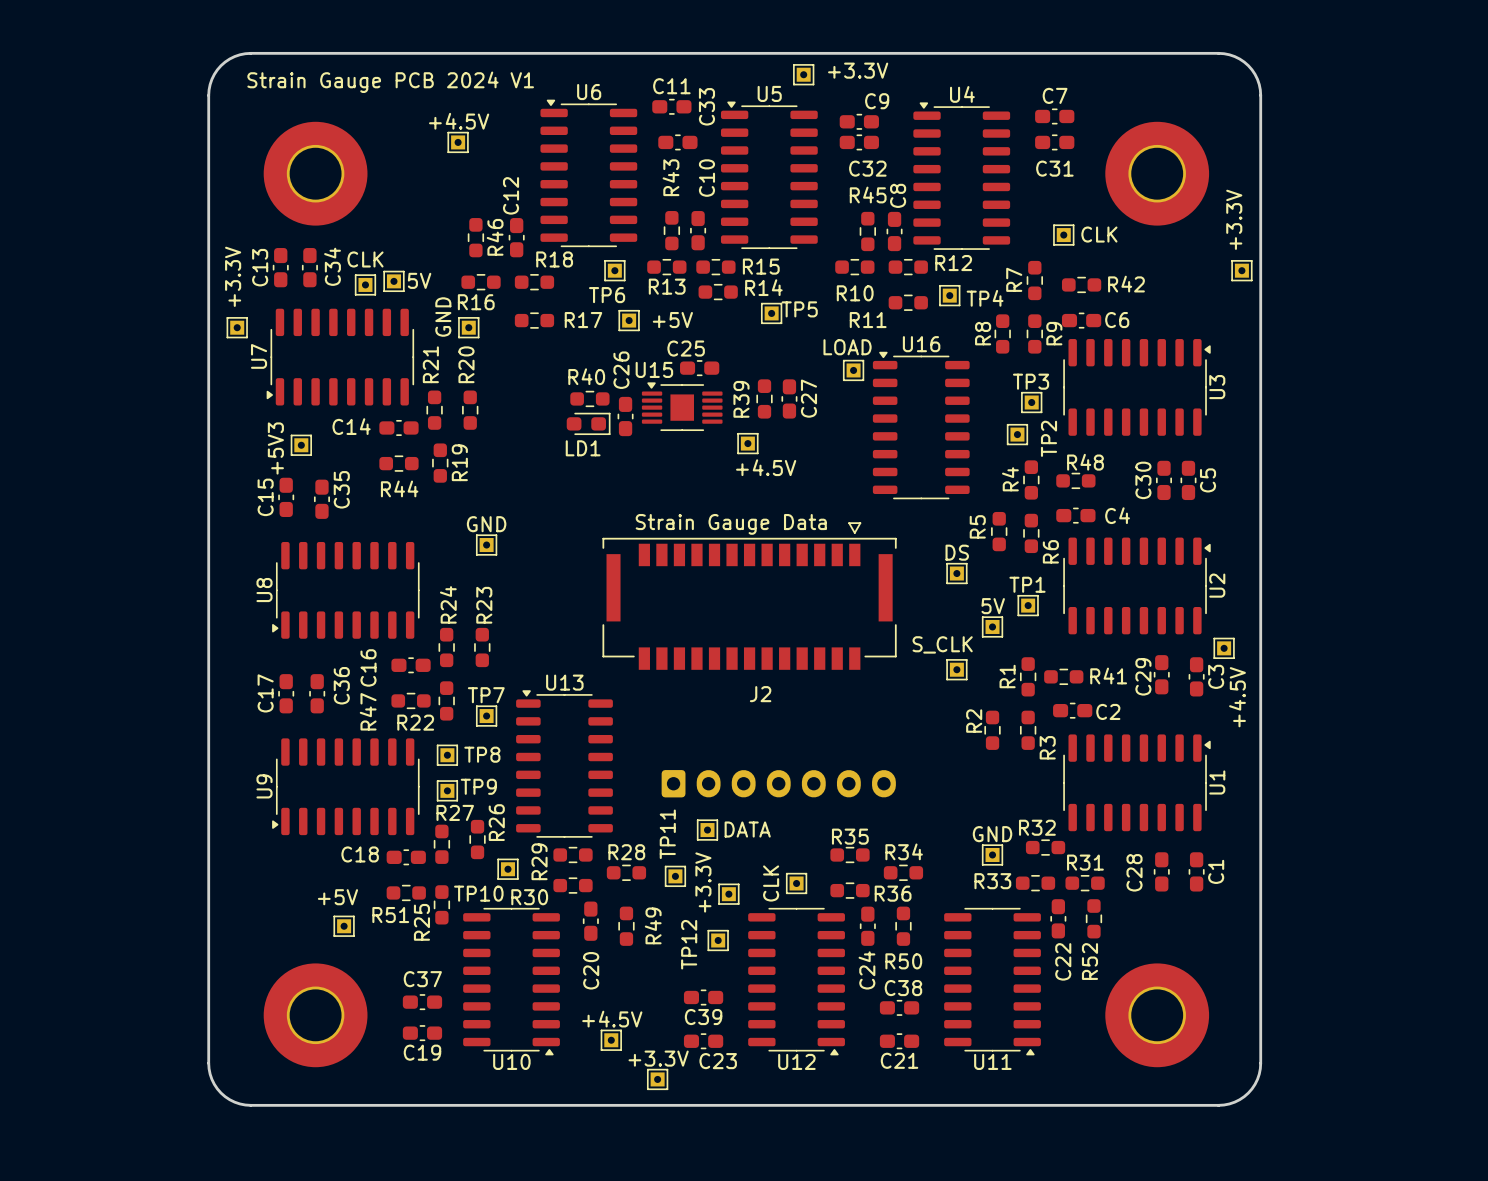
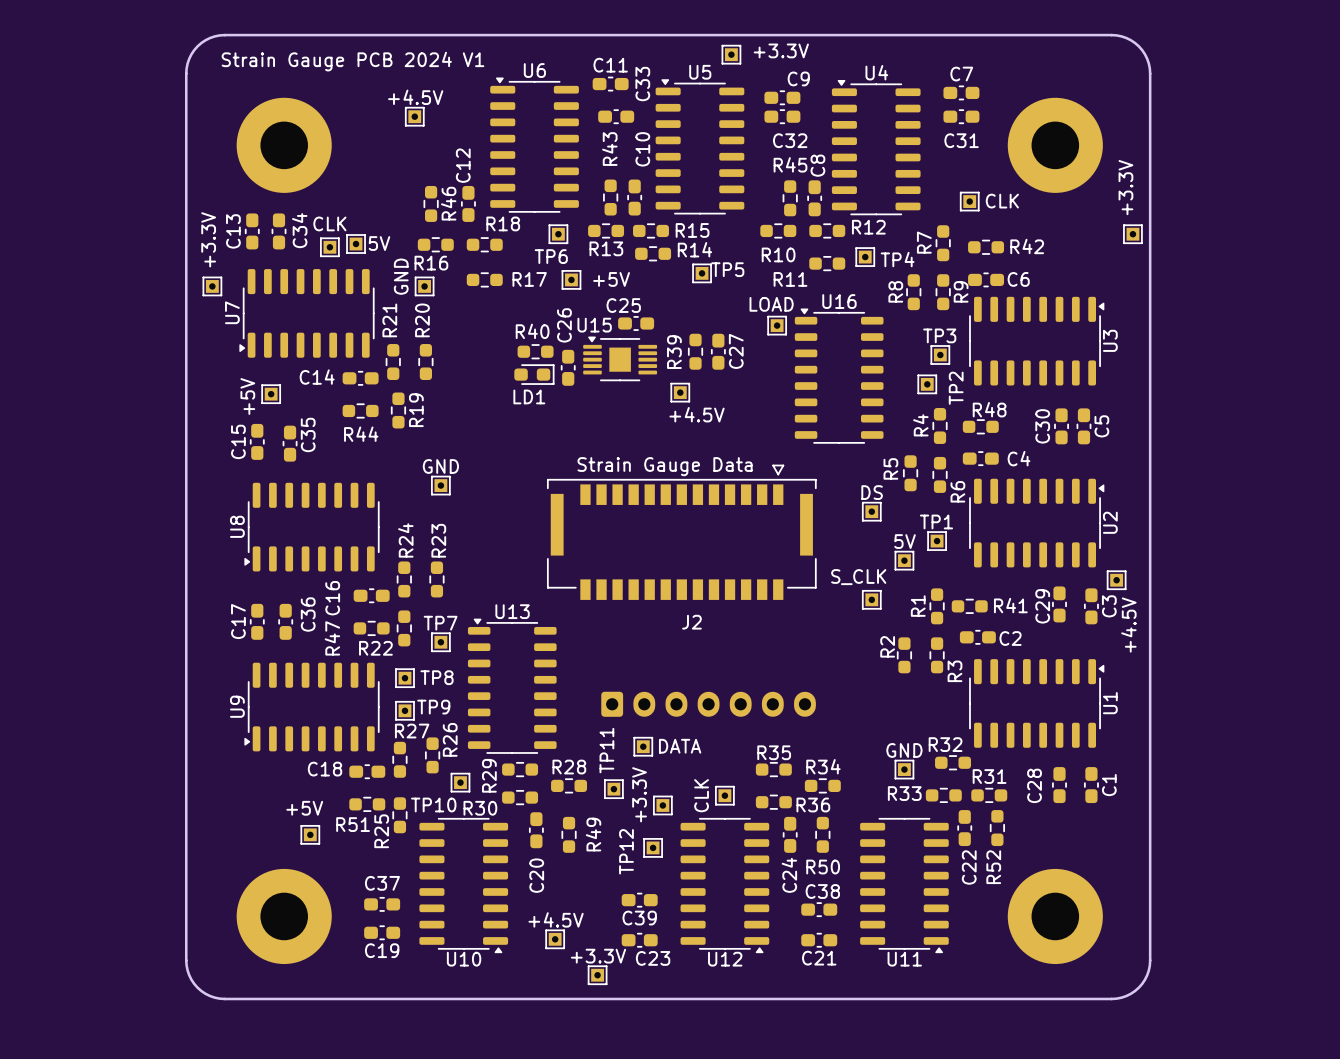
+5V3 name: +5V3 (275, 448) -> +5V (247, 396)

